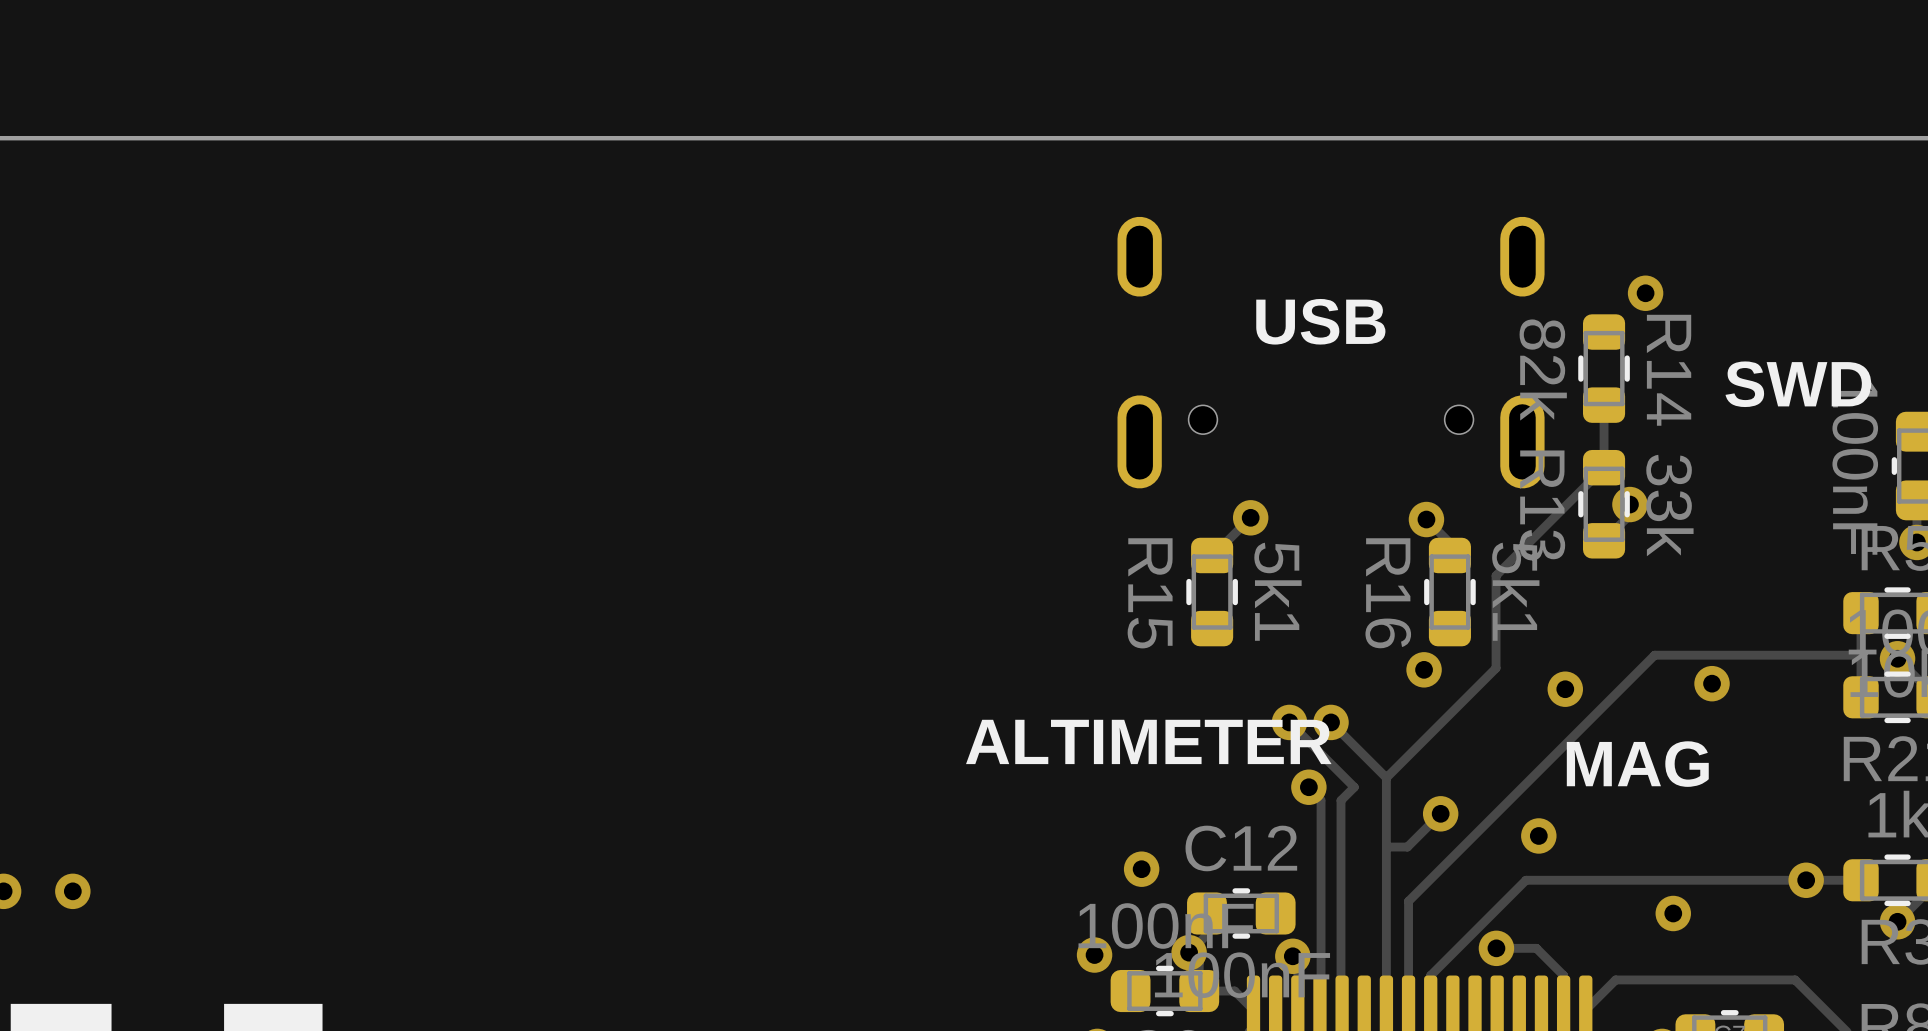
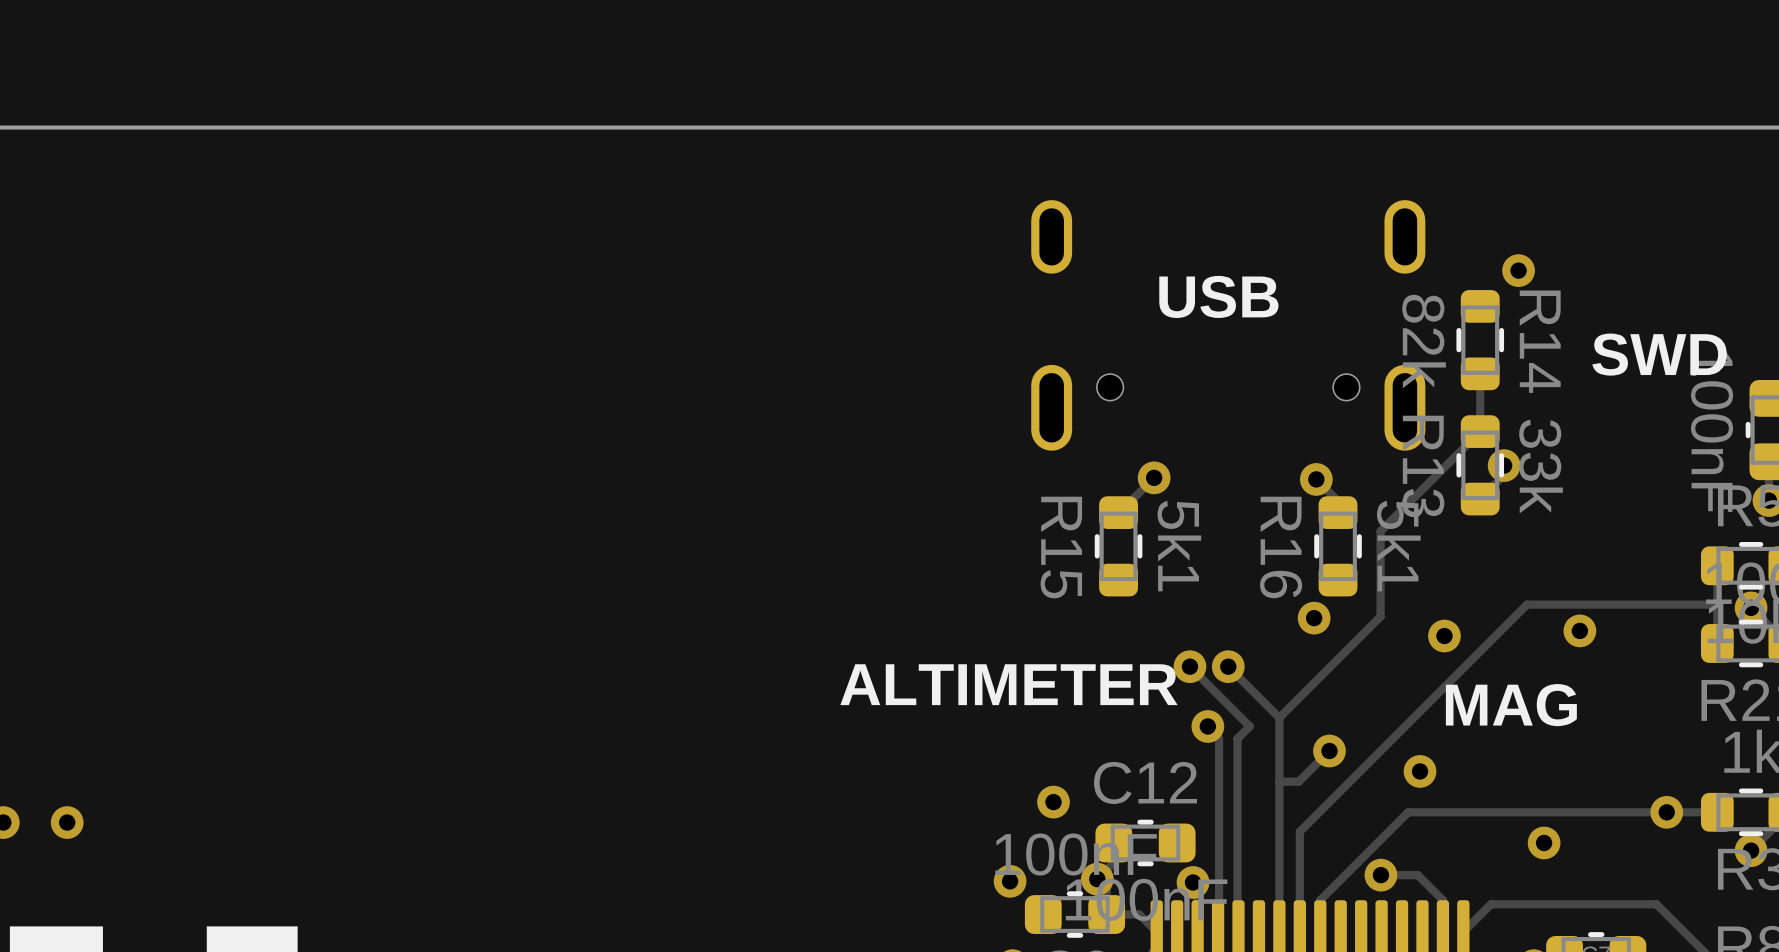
text position: ALTIMETER (1148, 741) -> ALTIMETER (1009, 684)

